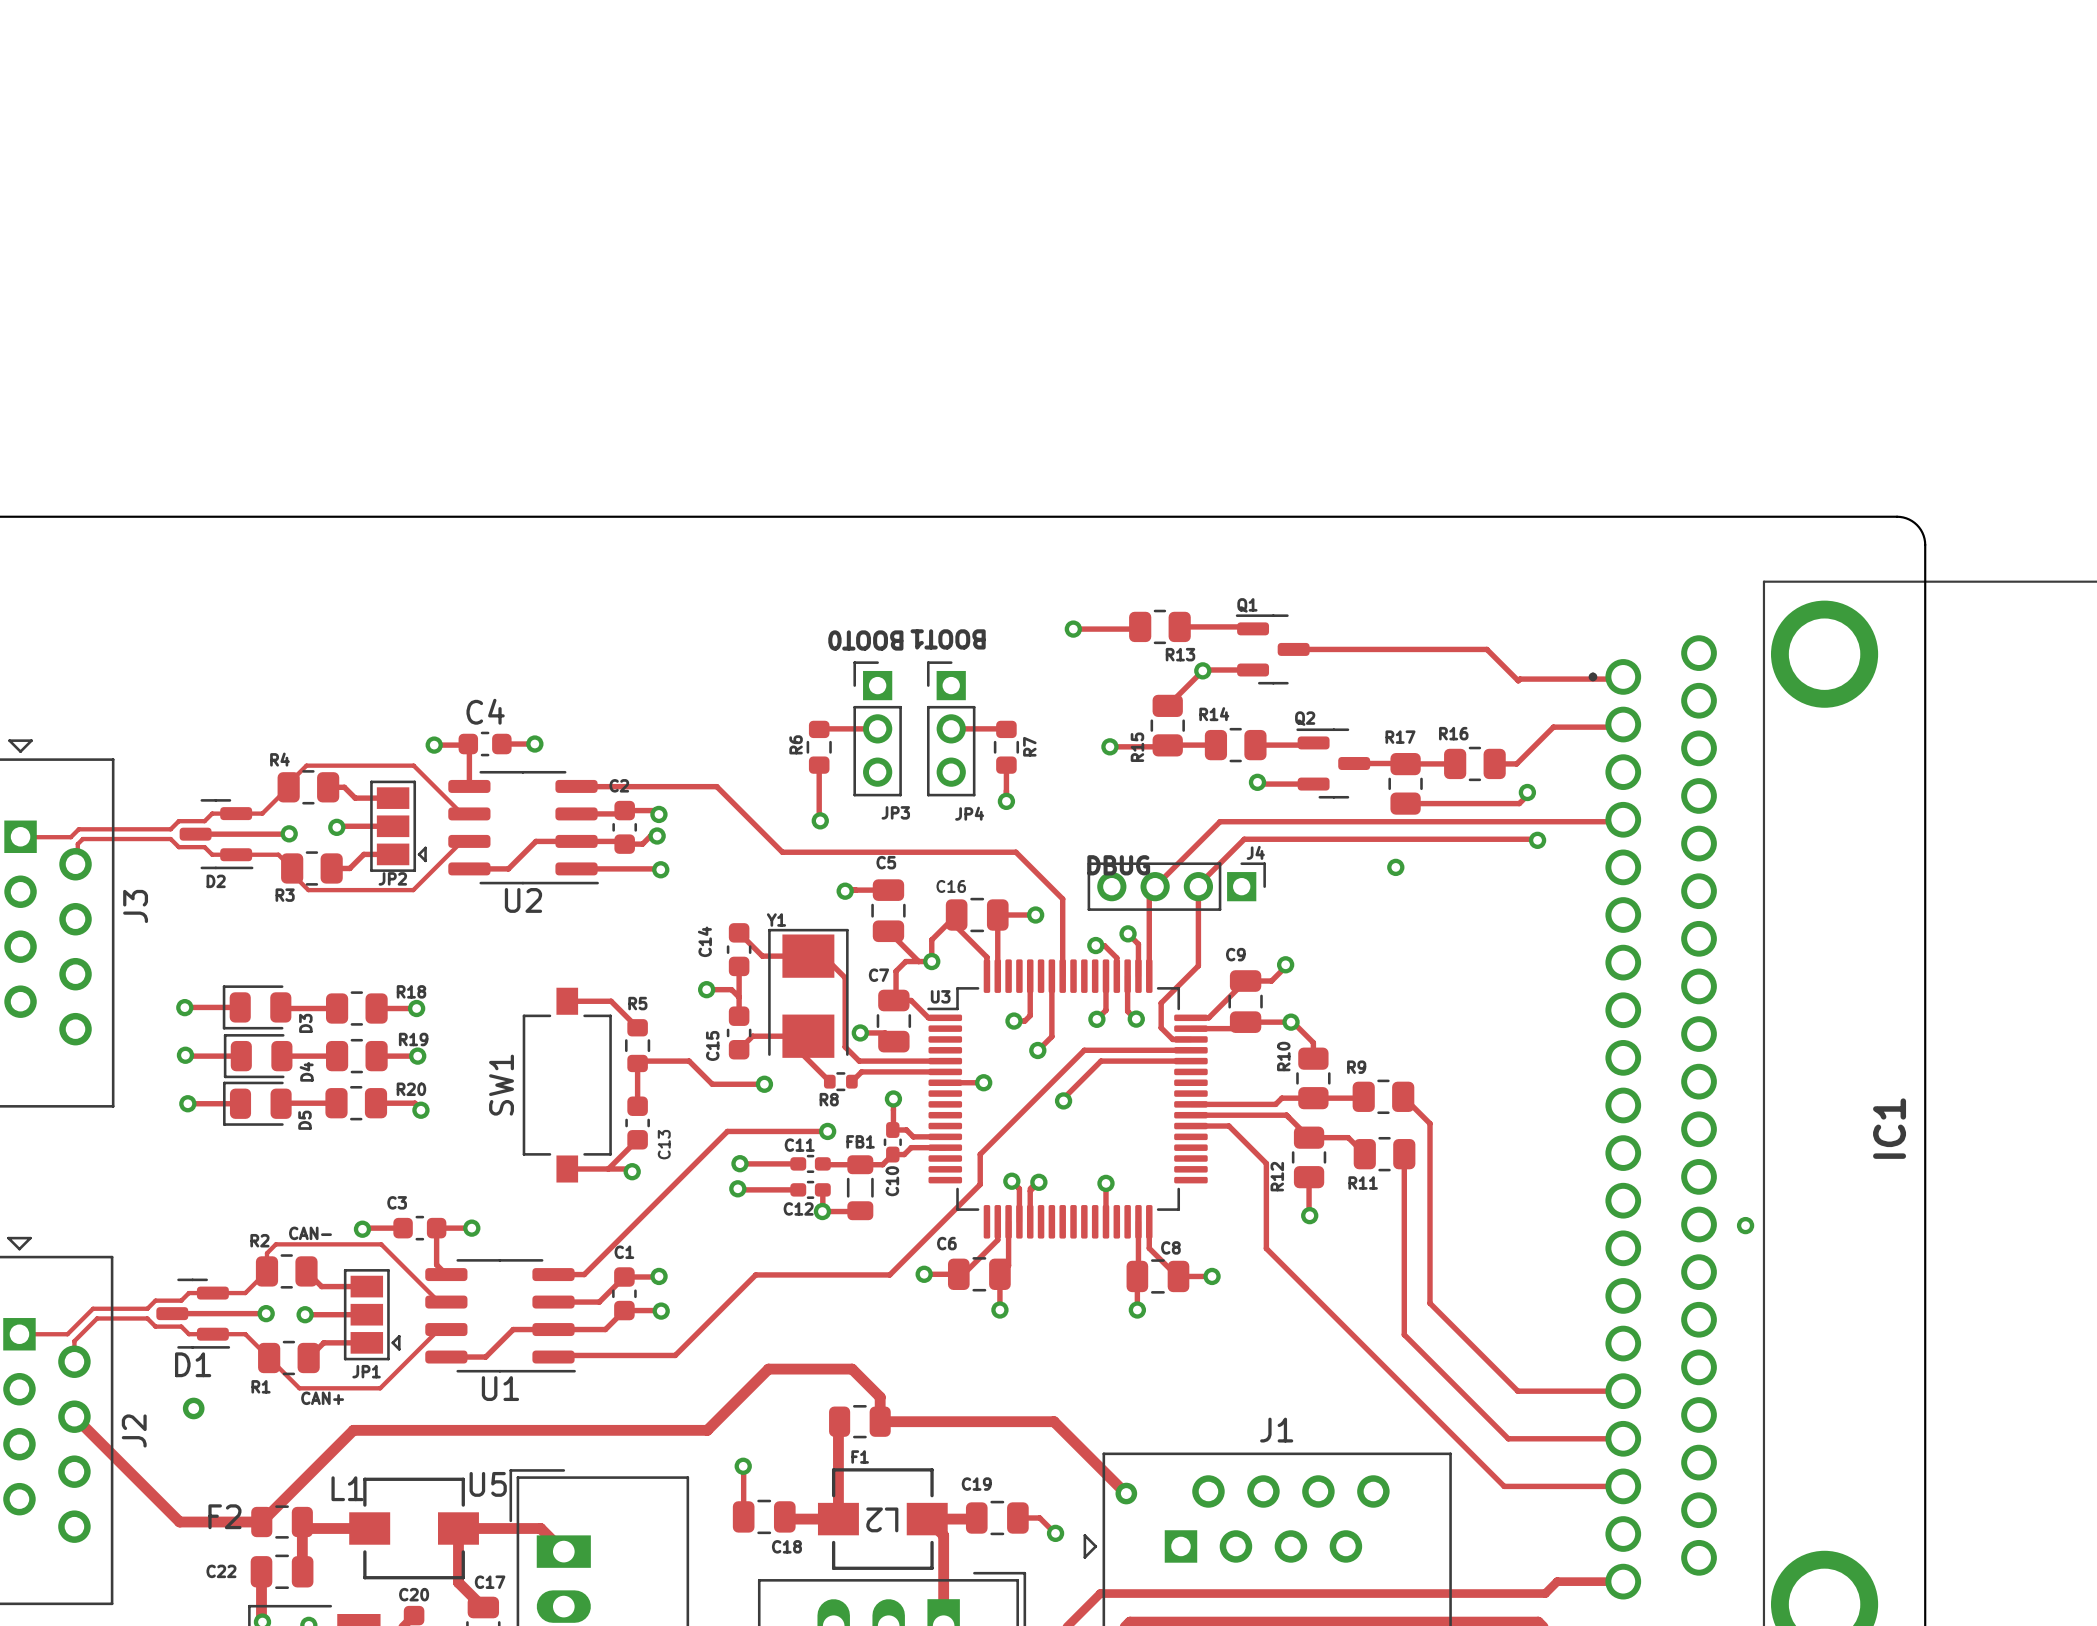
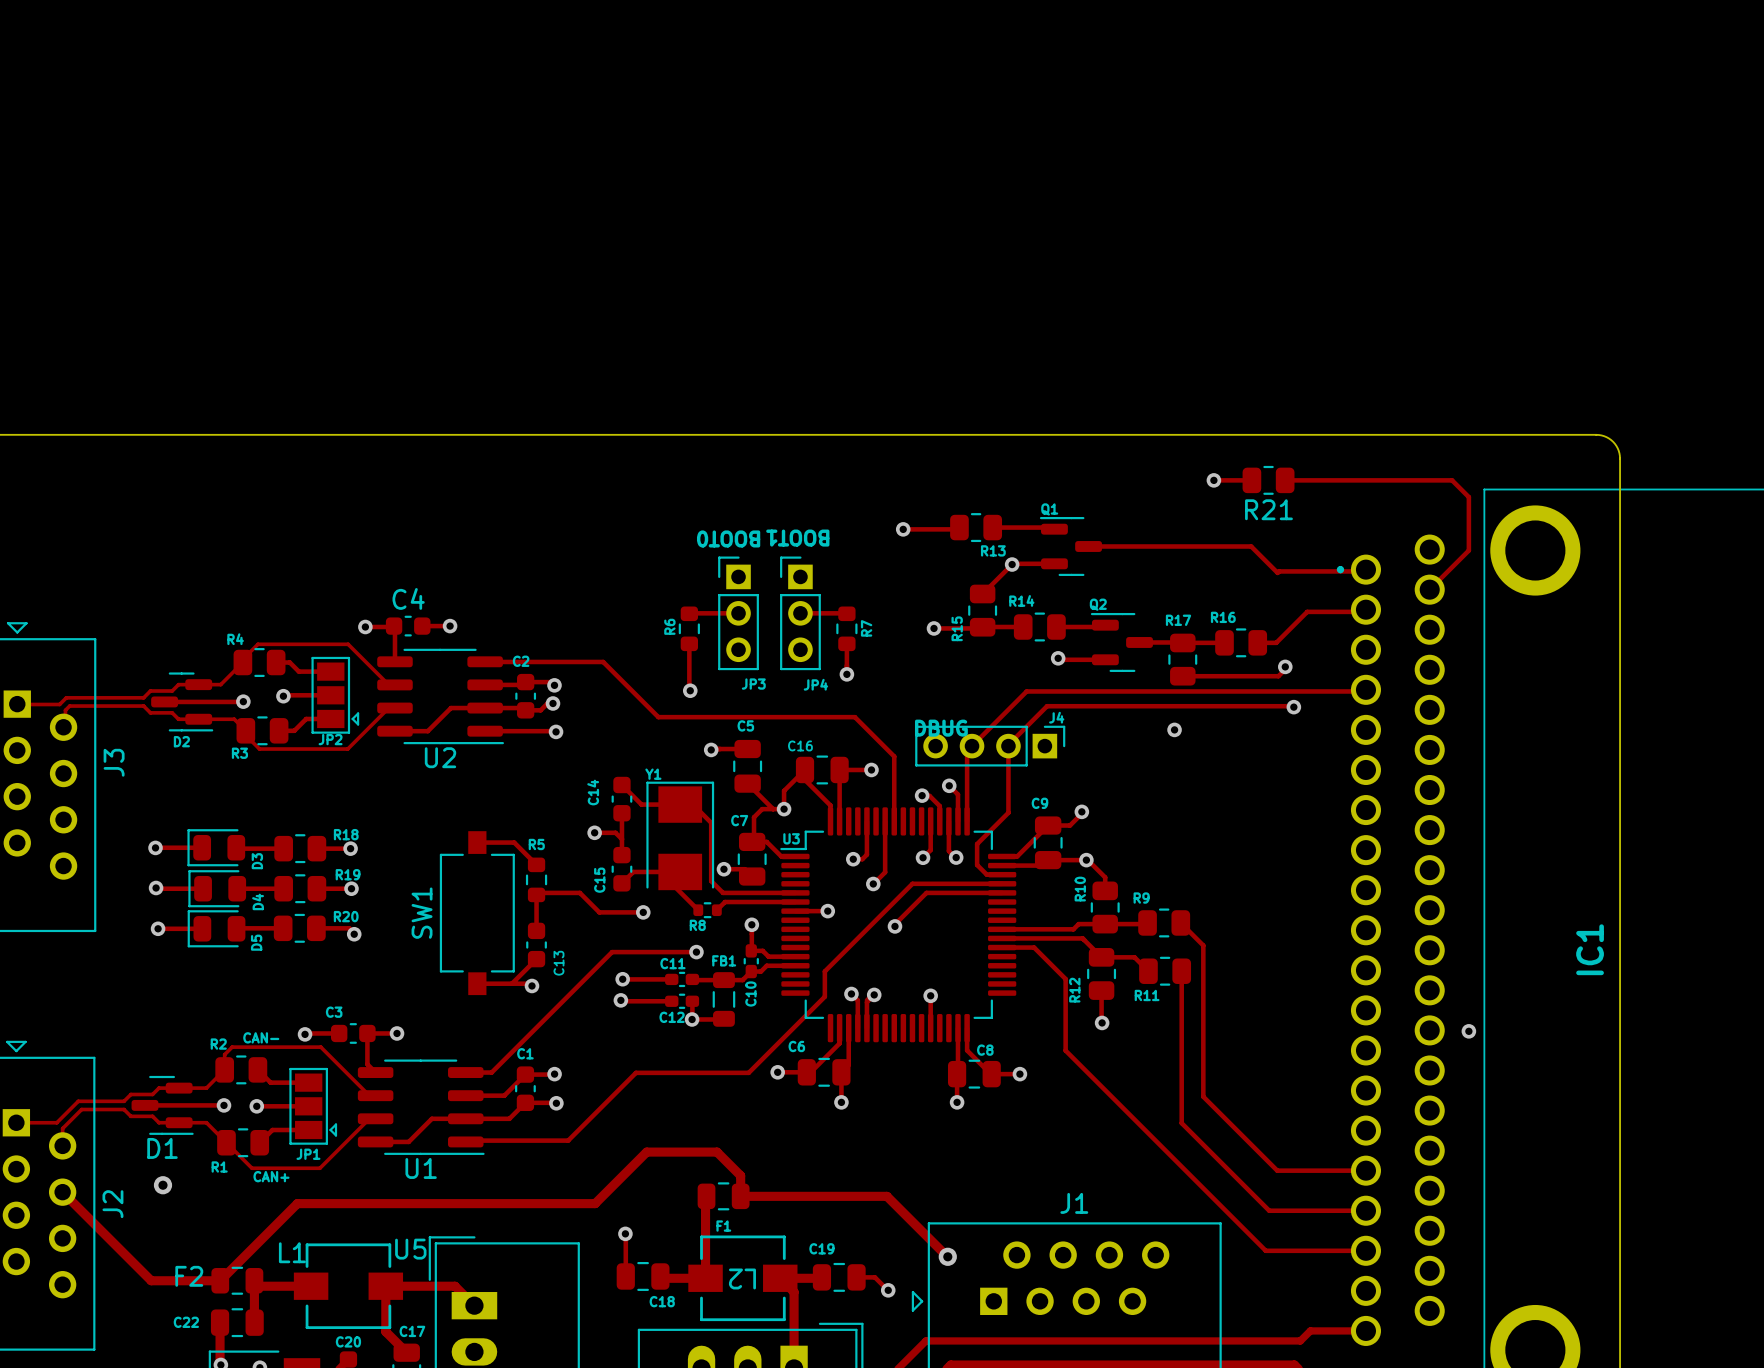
track: none -> (1213, 480) (1251, 480)
via: none -> (1213, 480)
R21: none -> (1268, 480)
track: none -> (1285, 480) (1452, 480) (1468, 497) (1468, 550) (1429, 589)

